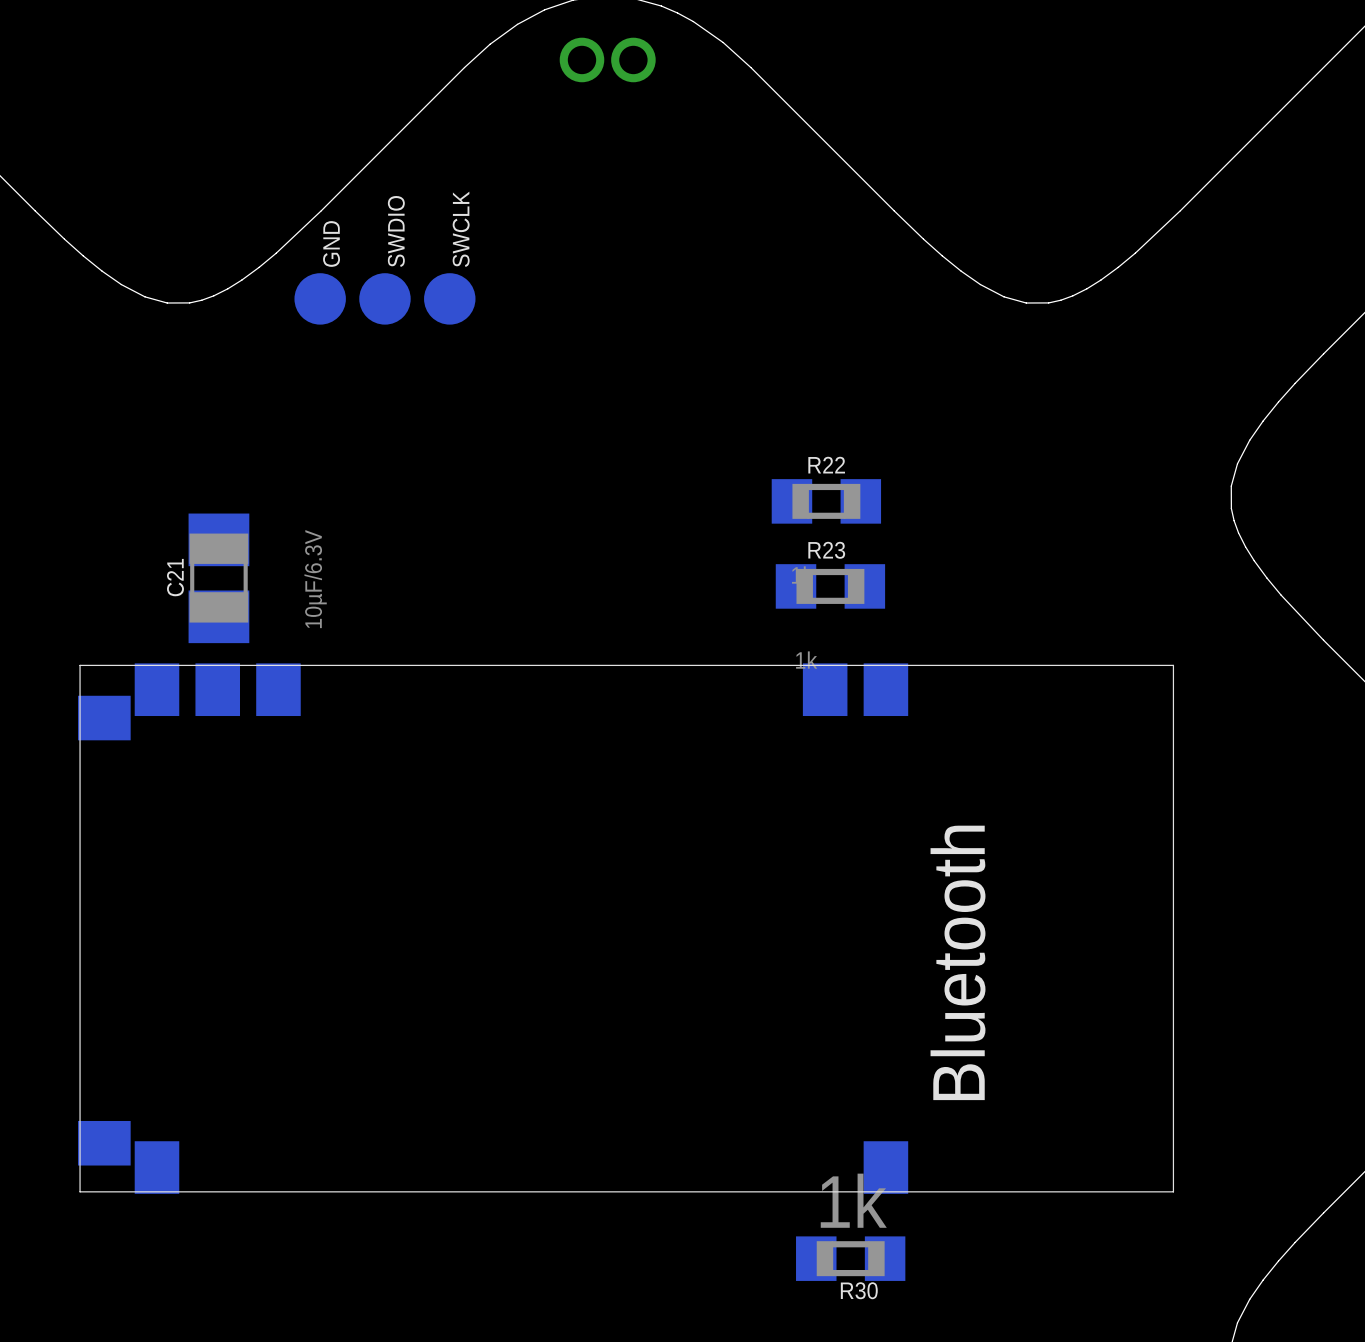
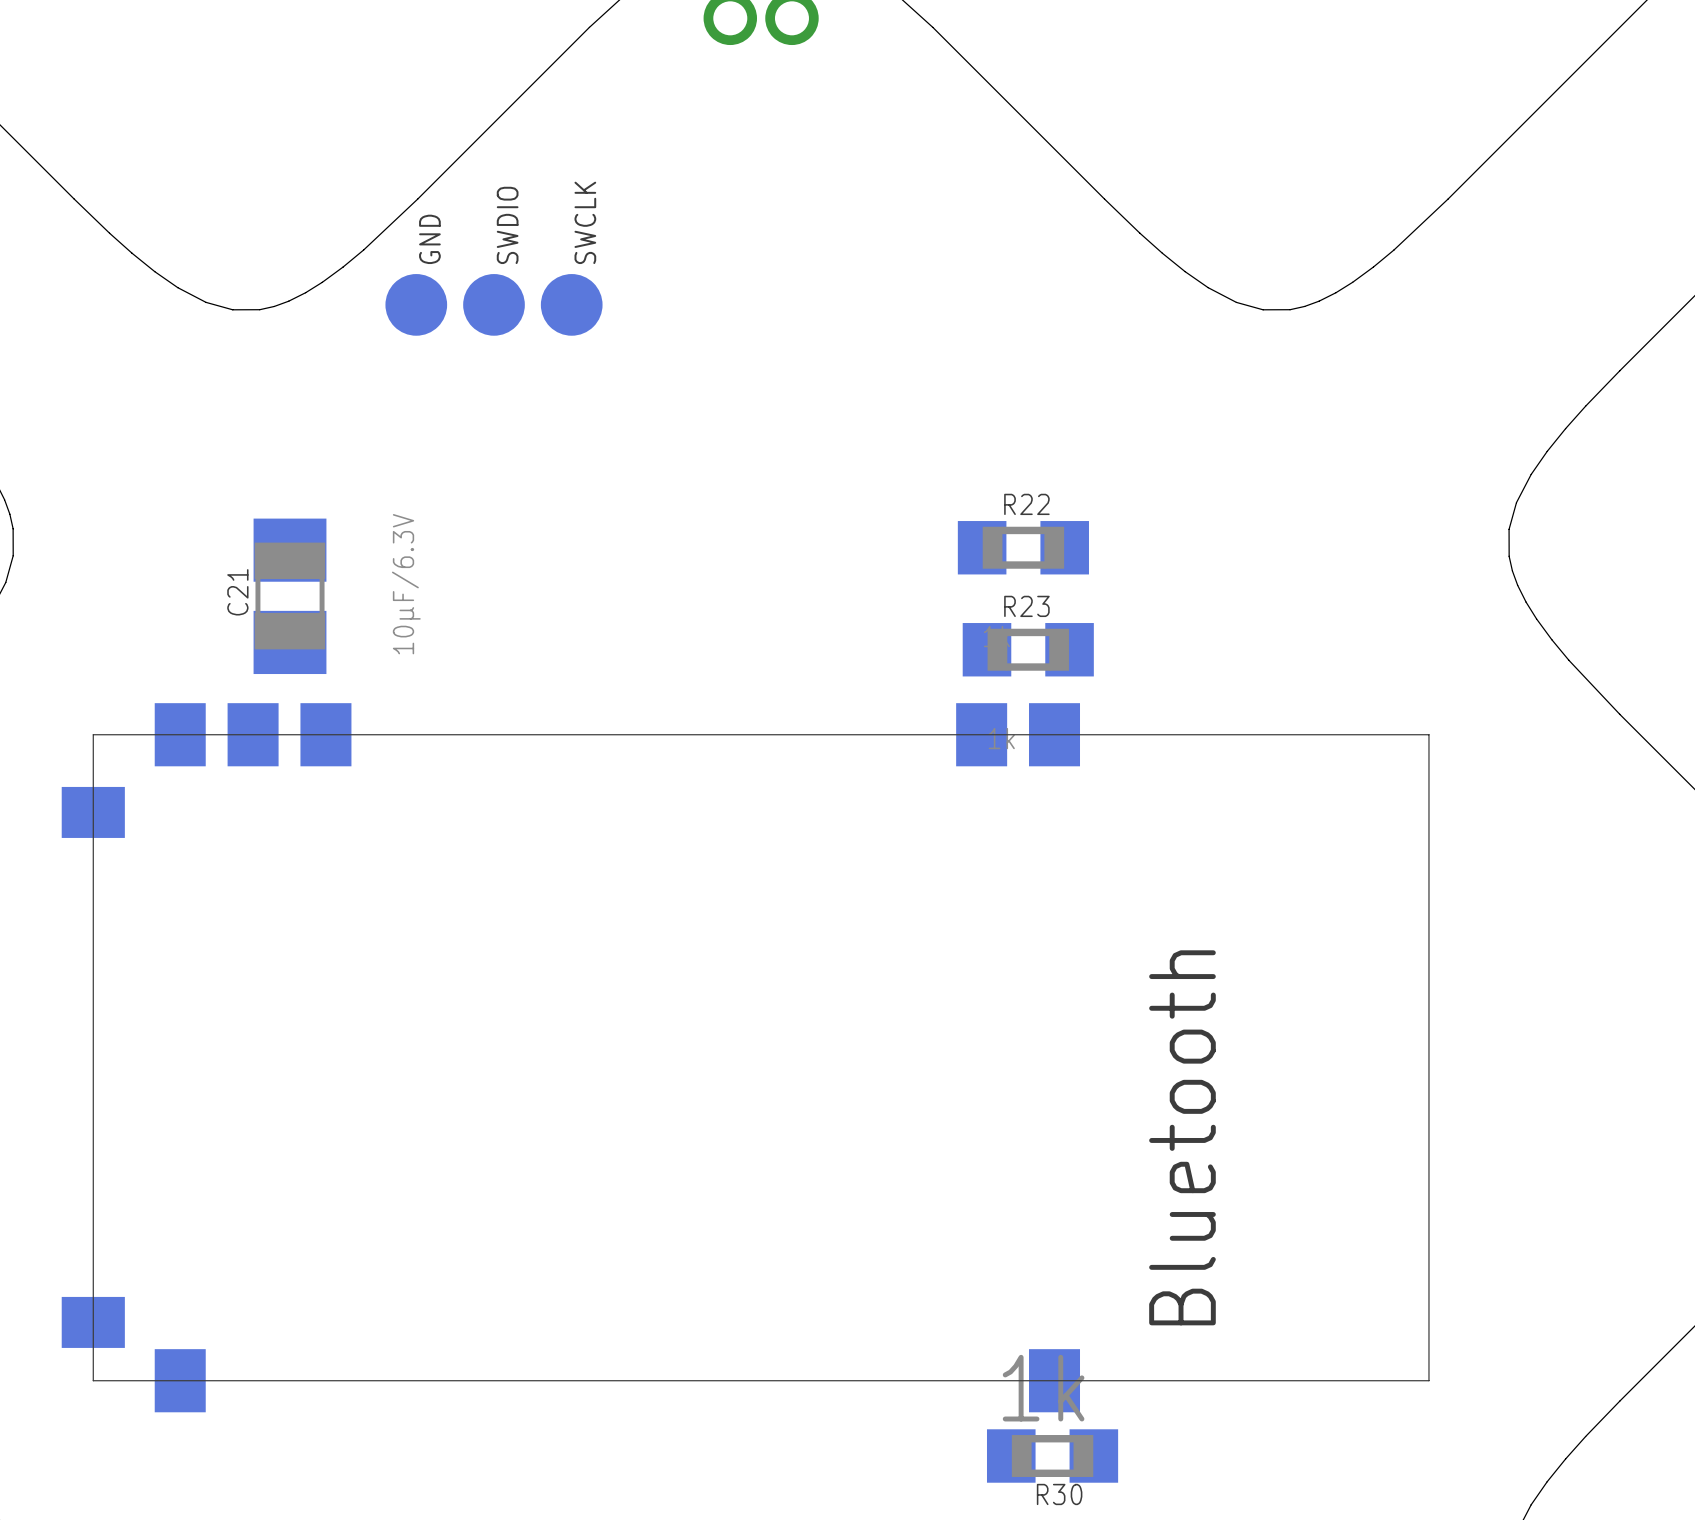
C21 position: (218, 578) -> (290, 596)
part footprint: [78, 663, 1174, 1194] -> [61, 703, 1429, 1413]

